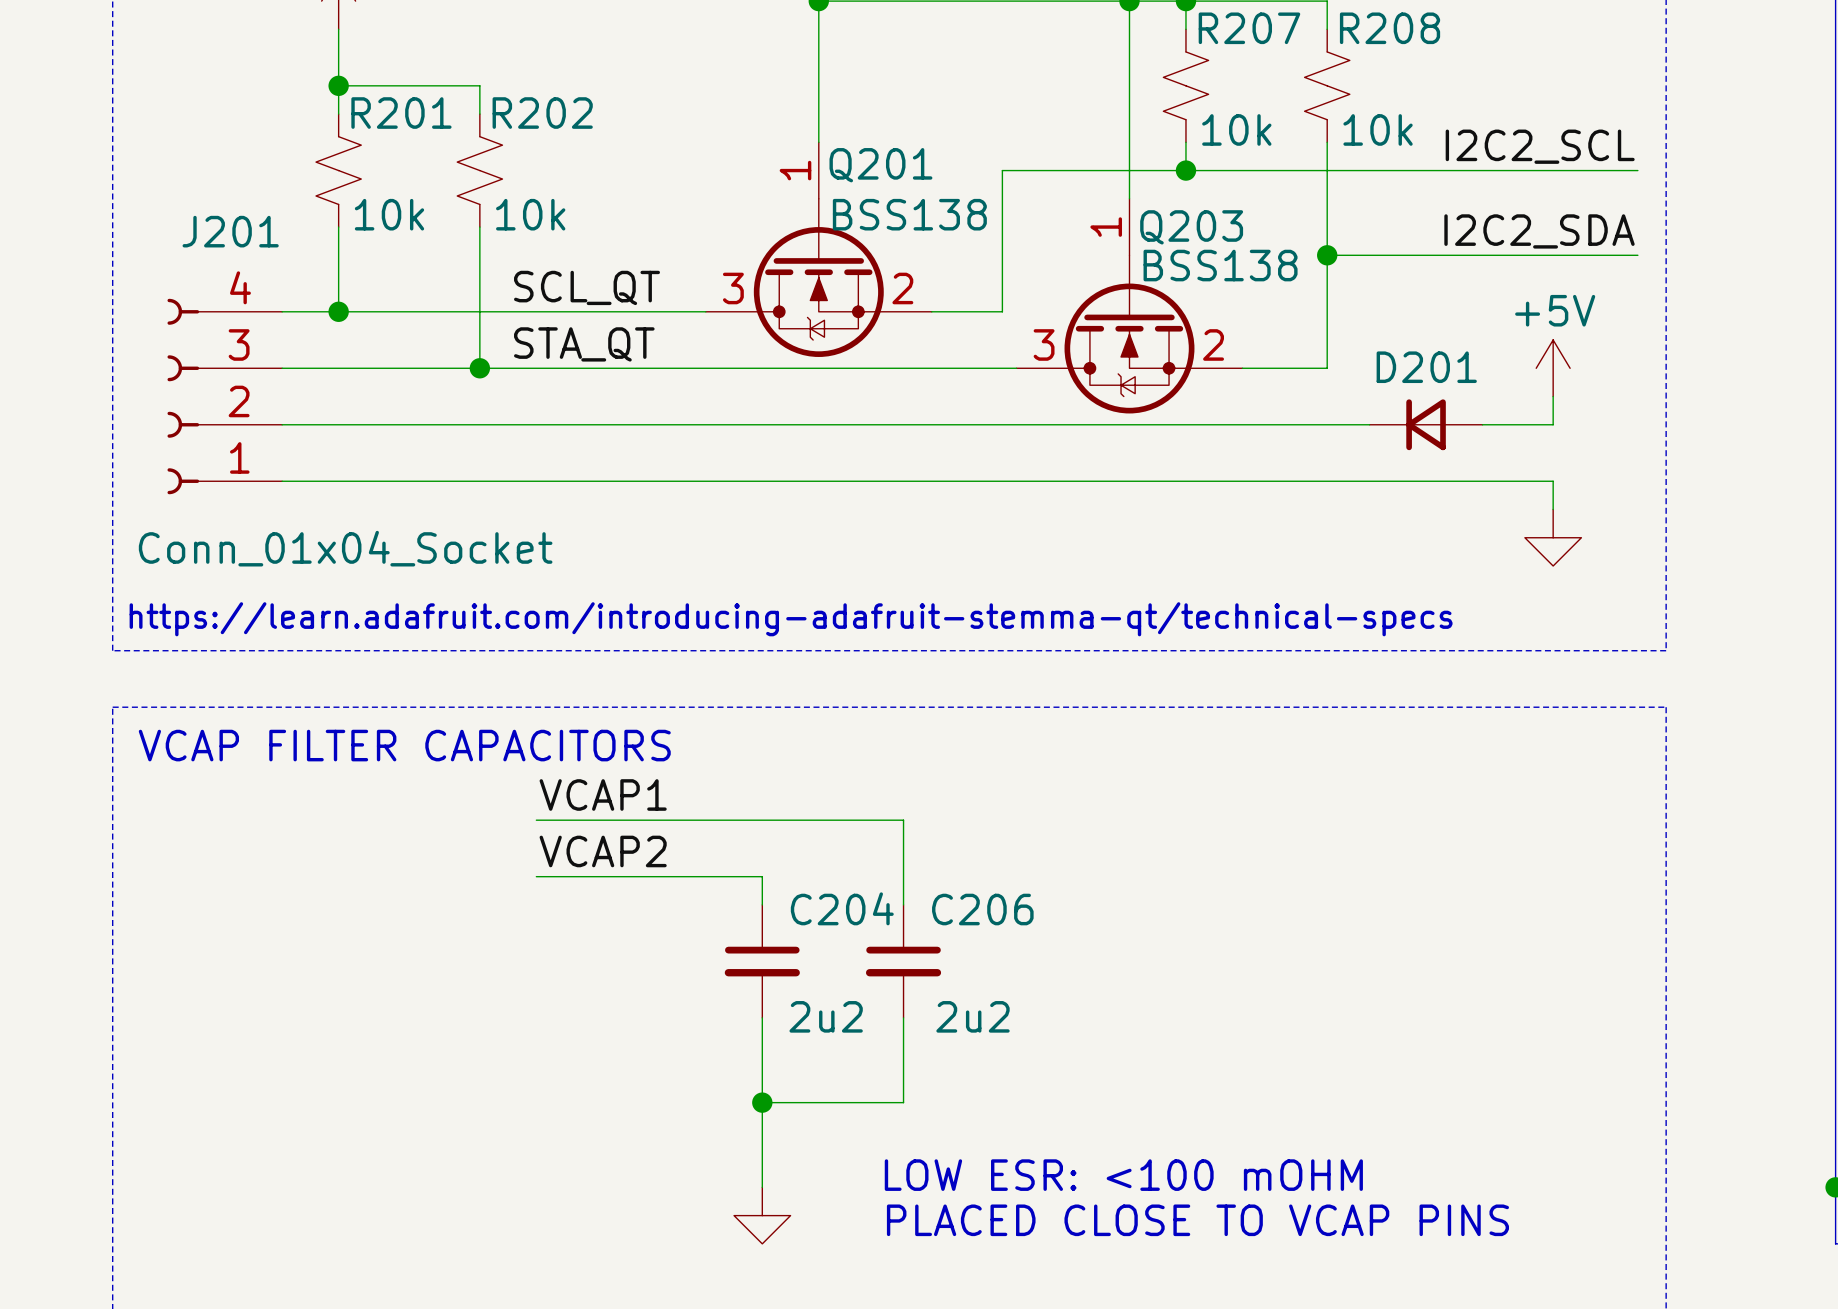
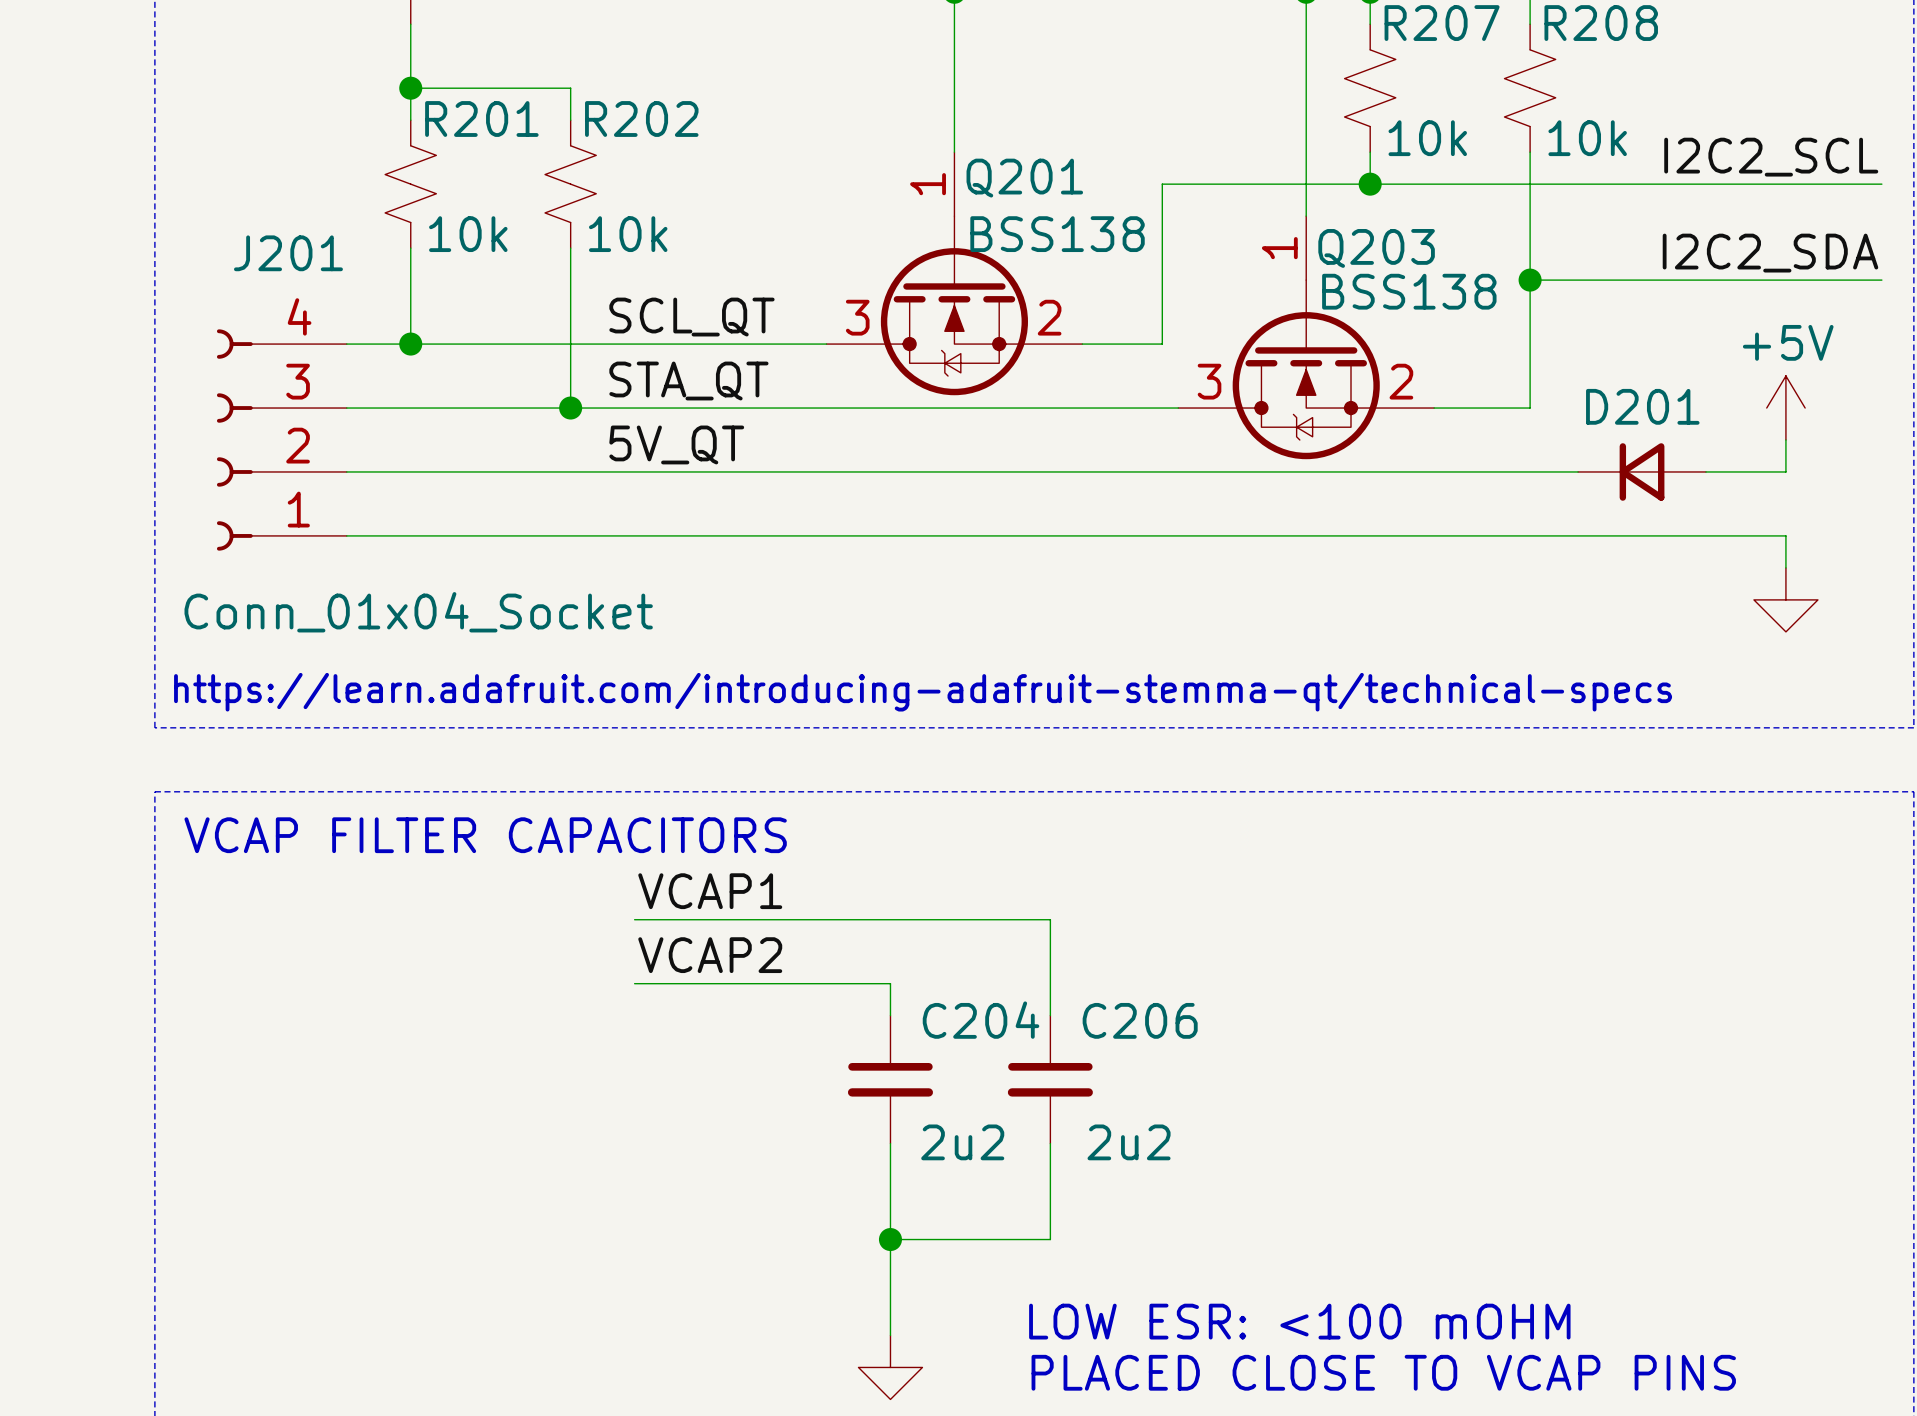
label: none -> 5V_QT (676, 444)

